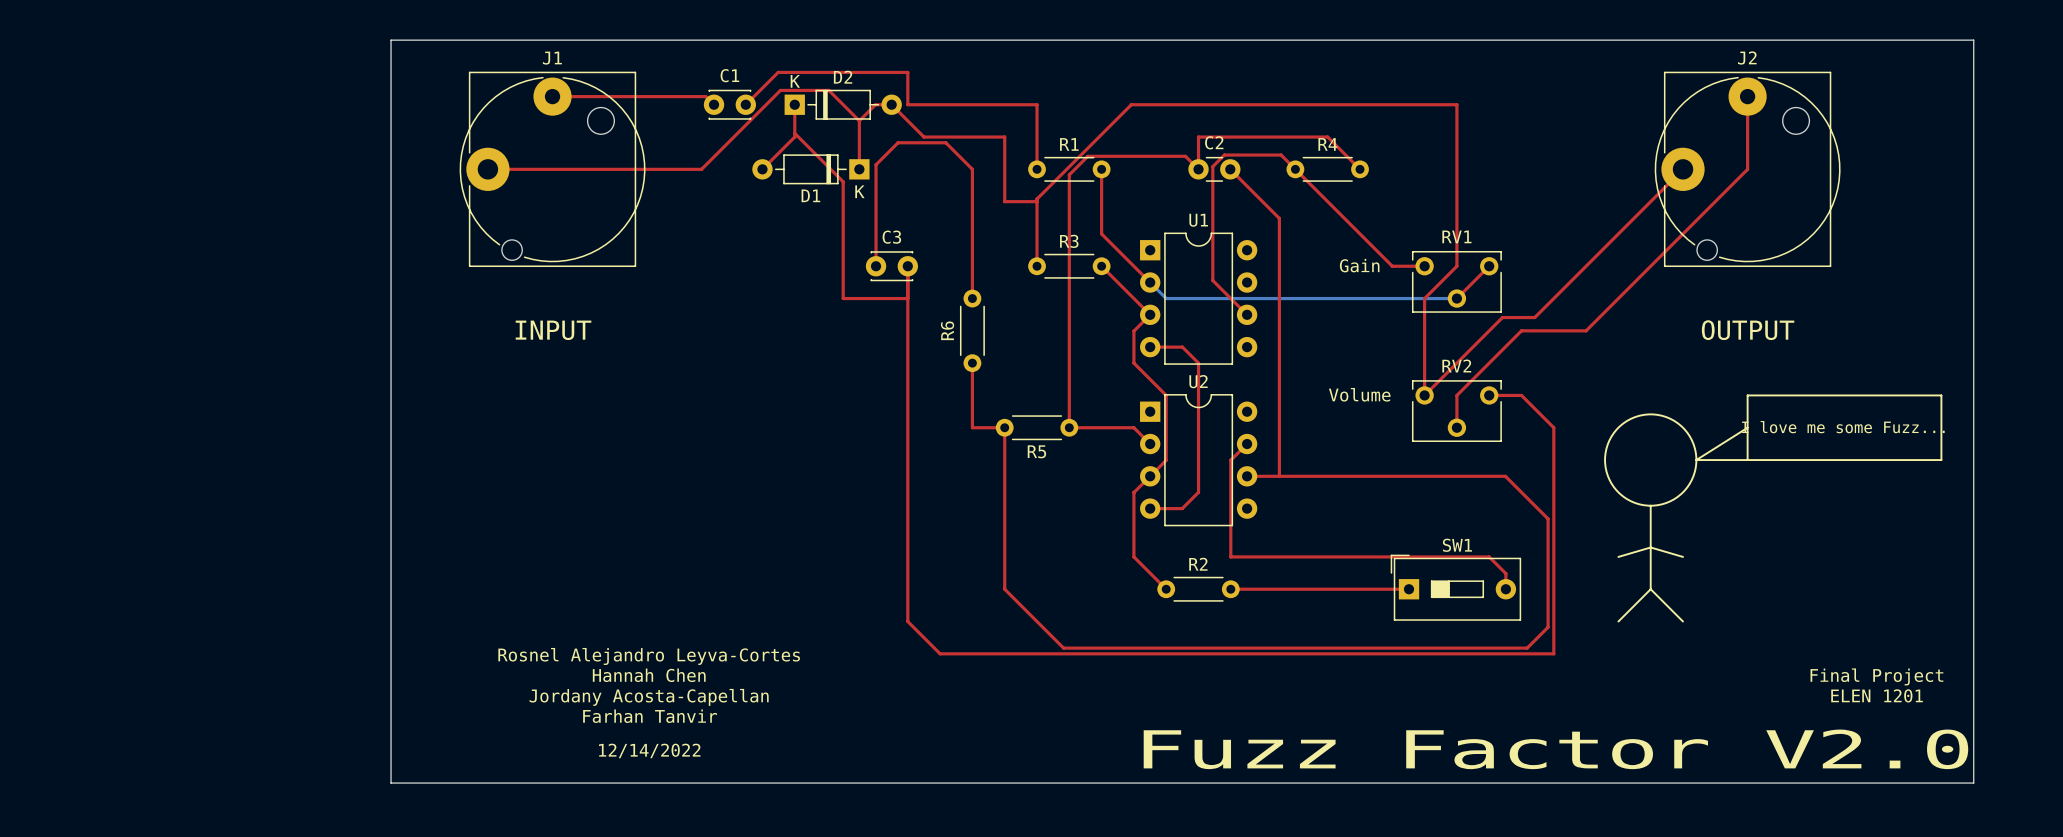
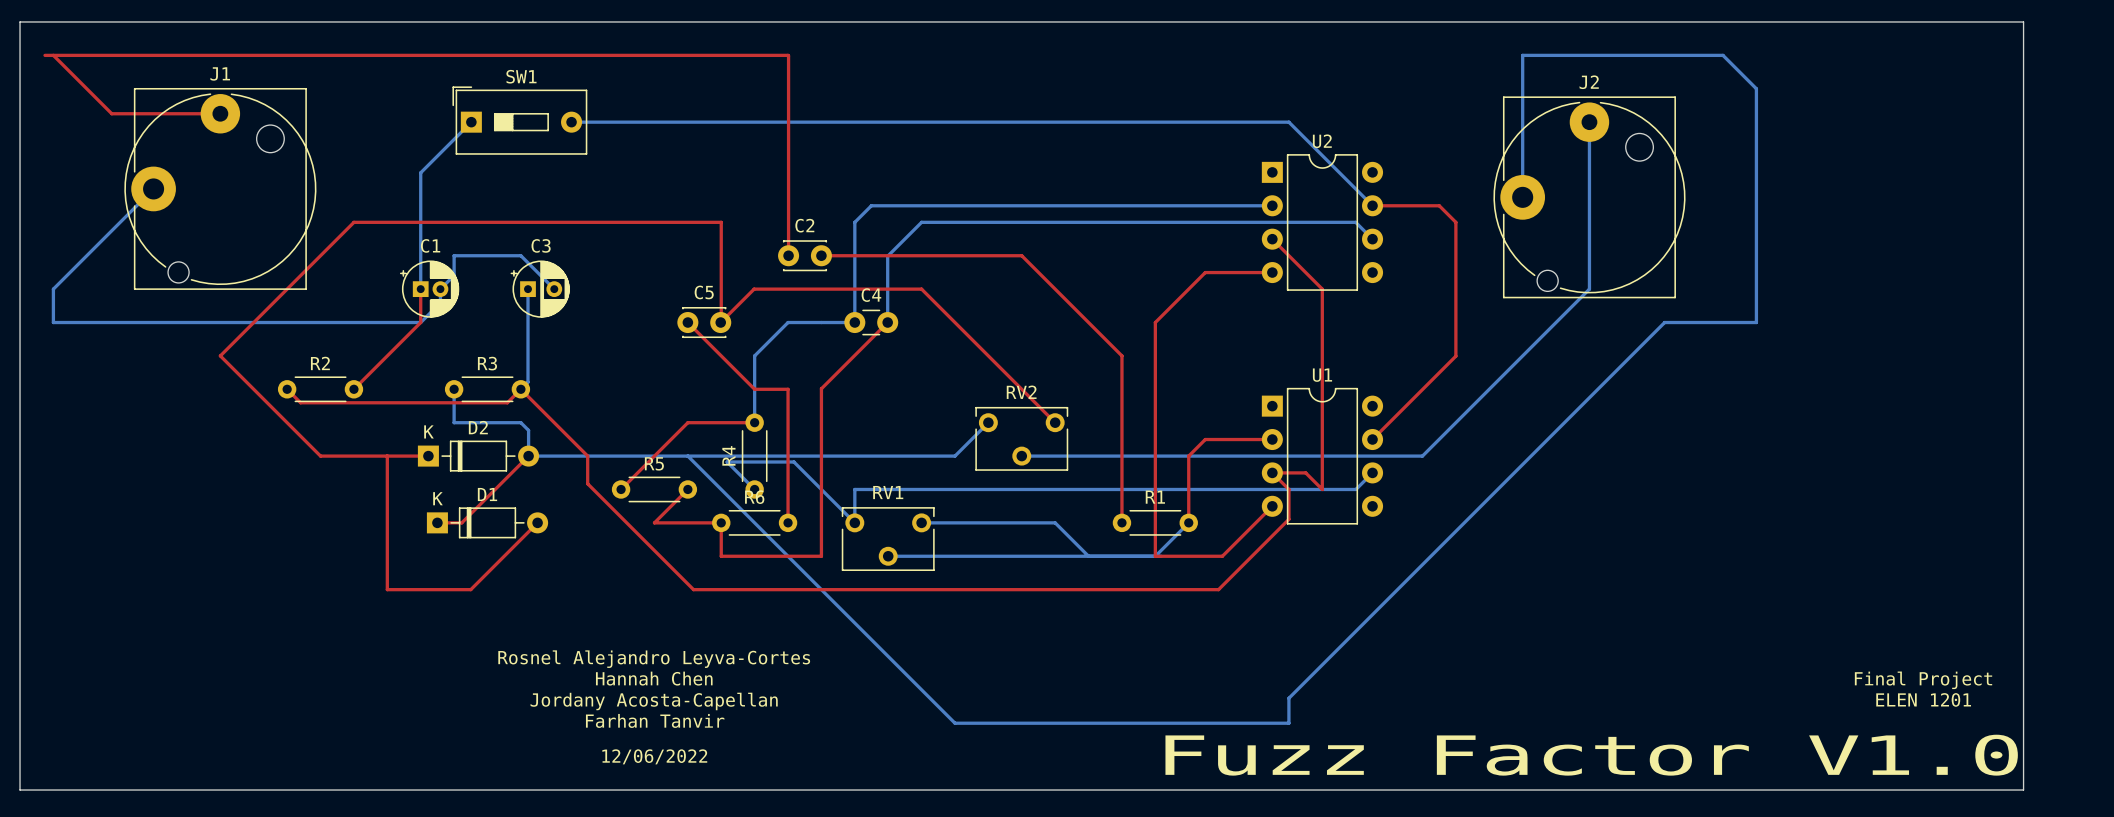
board edge: (391, 40) (391, 783) -> (387, 21) (20, 21) (20, 790) (387, 790)
top track: none -> (53, 55) (111, 113) (220, 113)
top track: (778, 72) (745, 104) -> (788, 55) (788, 255)
top track: (778, 72) (907, 72) (907, 104) (1037, 104) (1037, 169) -> (787, 55) (44, 55)
C1 footprint: [703, 89, 756, 120] -> [399, 260, 460, 318]
top track: (552, 96) (705, 96) (714, 104) -> none
top track: (1747, 96) (1747, 169) (1586, 330) (1521, 330) (1456, 395) (1456, 427) -> none
top track: (794, 104) (794, 137) (762, 169) -> none
D2 position: (843, 104) -> (478, 456)
top track: (859, 120) (828, 90) (780, 90) (701, 169) (487, 169) -> none
top track: (859, 120) (859, 169) -> none
top track: (859, 120) (875, 104) (891, 104) (923, 137) (1004, 137) (1004, 201) (1037, 201) -> none
top track: (794, 133) (843, 181) (843, 298) -> (720, 322) (754, 289) (854, 289)
bottom track: none -> (471, 122) (420, 172) (420, 289)
bottom track: none -> (571, 122) (1288, 122) (1372, 205)
bottom track: none -> (1589, 122) (1589, 289) (1422, 456) (1021, 456)
R4 name position: R4 (1327, 144) -> R4 (728, 455)
C2 footprint: [1188, 156, 1241, 182] -> [778, 240, 832, 272]
J1 position: (552, 169) -> (220, 188)
D1 rotation: 0° (810, 169) -> 180° (487, 522)
D1 position: (810, 169) -> (487, 522)
R1 position: (1069, 169) -> (1155, 522)
top track: (1101, 169) (1101, 233) (1150, 282) -> none
top track: (1230, 169) (1279, 218) (1279, 476) (1505, 476) (1548, 518) (1548, 627) (1527, 648) (1063, 648) (1004, 589) (1004, 427) (972, 427) (972, 363) -> none
R4 rotation: 0° (1327, 169) -> 90° clockwise (754, 456)
R4 position: (1327, 169) -> (754, 456)
top track: (1360, 169) (1327, 137) (1198, 137) (1198, 169) (1185, 156) (1087, 156) (1069, 174) (1069, 427) (1133, 427) (1150, 444) -> none
top track: (1683, 169) (1534, 317) (1502, 317) (1424, 395) (1424, 363) -> (1372, 439) (1455, 356)
J2 position: (1747, 169) -> (1589, 197)
bottom track: none -> (153, 188) (53, 289) (53, 322) (420, 322) (440, 302) (440, 289) (454, 275) (454, 255) (520, 255) (554, 289)
bottom track: none -> (1522, 197) (1522, 55) (1723, 55) (1756, 88) (1756, 322) (1664, 322) (1288, 698) (1288, 723) (955, 723) (687, 456)
bottom track: none -> (1272, 205) (871, 205) (854, 222) (854, 322) (788, 322) (754, 355) (754, 422)
top track: none -> (1272, 239) (1322, 289) (1322, 489) (1305, 472)
bottom track: none -> (1372, 239) (1355, 222) (921, 222) (887, 256) (887, 322)
C3 footprint: [865, 251, 918, 282] -> [510, 260, 570, 318]
text: Gain (1359, 265) -> none
top track: none -> (821, 255) (1021, 255) (1121, 355) (1121, 522)
top track: (876, 266) (876, 164) (898, 142) (945, 142) (972, 169) (972, 298) -> none
top track: (907, 266) (907, 621) (940, 653) (1553, 653) (1553, 427) (1521, 395) (1489, 395) -> none
top track: (1037, 266) (1037, 199) (1131, 104) (1456, 104) (1456, 266) (1424, 298) -> (1372, 205) (1439, 205) (1455, 222) (1455, 289)
R3 position: (1069, 266) -> (487, 389)
top track: (1101, 266) (1150, 314) (1133, 331) -> (1272, 272) (1205, 272) (1155, 322)
top track: (1424, 266) (1392, 266) (1281, 155) (1224, 155) (1212, 166) (1212, 280) (1247, 314) -> none
top track: (1489, 266) (1456, 298) -> none
RV1 position: (1456, 281) -> (888, 539)
bottom track: (1150, 282) (1166, 298) (1456, 298) -> none
top track: none -> (420, 289) (420, 322) (353, 389)
bottom track: none -> (528, 289) (528, 382) (520, 389)
top track: none -> (921, 289) (1055, 422)
U1 position: (1198, 298) -> (1322, 456)
text: INPUT (553, 330) -> none
top track: none -> (687, 322) (754, 389) (788, 389) (788, 522)
C5: none -> (704, 322)
top track: none -> (721, 322) (721, 222) (353, 222) (220, 355) (320, 456) (428, 456)
C4: none -> (871, 322)
top track: none -> (887, 322) (821, 388) (821, 556) (721, 556) (721, 522) (654, 522) (687, 489)
R6 rotation: 0° (972, 330) -> 90° clockwise (754, 522)
R6 position: (972, 330) -> (754, 522)
text: OUTPUT (1748, 330) -> none
top track: (1150, 347) (1182, 347) (1198, 363) (1198, 492) (1182, 508) (1150, 508) -> none
top track: (1133, 363) (1166, 395) (1166, 460) -> (1155, 355) (1155, 489)
text: Volume (1359, 394) -> none
top track: none -> (287, 389) (300, 402) (507, 402) (520, 389) (587, 456) (587, 483) (693, 589) (1218, 589) (1288, 519) (1288, 489) (1272, 472)
bottom track: none -> (454, 389) (454, 422) (520, 422) (528, 430) (528, 456) (955, 456) (988, 422)
RV2 position: (1456, 411) -> (1021, 438)
drawing: [1604, 413, 1698, 507] -> none
top track: none -> (754, 422) (687, 422) (621, 489)
R5 position: (1037, 427) -> (654, 489)
line: (1747, 427) (1696, 460) (1941, 460) (1941, 395) (1747, 395) (1747, 460) -> none
text: I love me some Fuzz... (1843, 427) -> none
top track: (1247, 444) (1231, 460) -> (1272, 439) (1205, 439) (1188, 456)
R5 name position: R5 (1036, 451) -> R5 (654, 463)
top track: none -> (387, 456) (387, 589) (470, 589) (537, 522)
top track: none -> (528, 456) (461, 522) (437, 522)
top track: (1166, 460) (1134, 492) -> (1188, 456) (1188, 522)
U2 position: (1198, 460) -> (1322, 222)
top track: (1230, 460) (1230, 556) (1489, 556) (1505, 573) (1505, 589) -> none
bottom track: none -> (1372, 472) (1355, 489) (854, 489) (854, 522) (793, 462) (727, 462) (754, 489)
line: (1650, 505) (1650, 589) -> none
bottom track: none -> (921, 522) (1055, 522) (1088, 556)
bottom track: none -> (1188, 522) (1155, 556)
bottom track: none -> (888, 556) (1161, 556)
top track: (1133, 556) (1166, 589) -> (1155, 556) (1222, 556) (1272, 506)
line: (1618, 556) (1650, 547) (1683, 556) -> none
SW1 position: (1455, 587) -> (519, 120)
R2 position: (1198, 589) -> (320, 389)
top track: (1230, 589) (1409, 589) -> none
line: (1650, 589) (1618, 621) -> none
line: (1650, 589) (1683, 621) -> none
text: Fuzz Factor V2.0 (1555, 749) -> Fuzz Factor V1.0 (1591, 755)
text: 12/14/2022 (649, 750) -> 12/06/2022 (654, 756)

